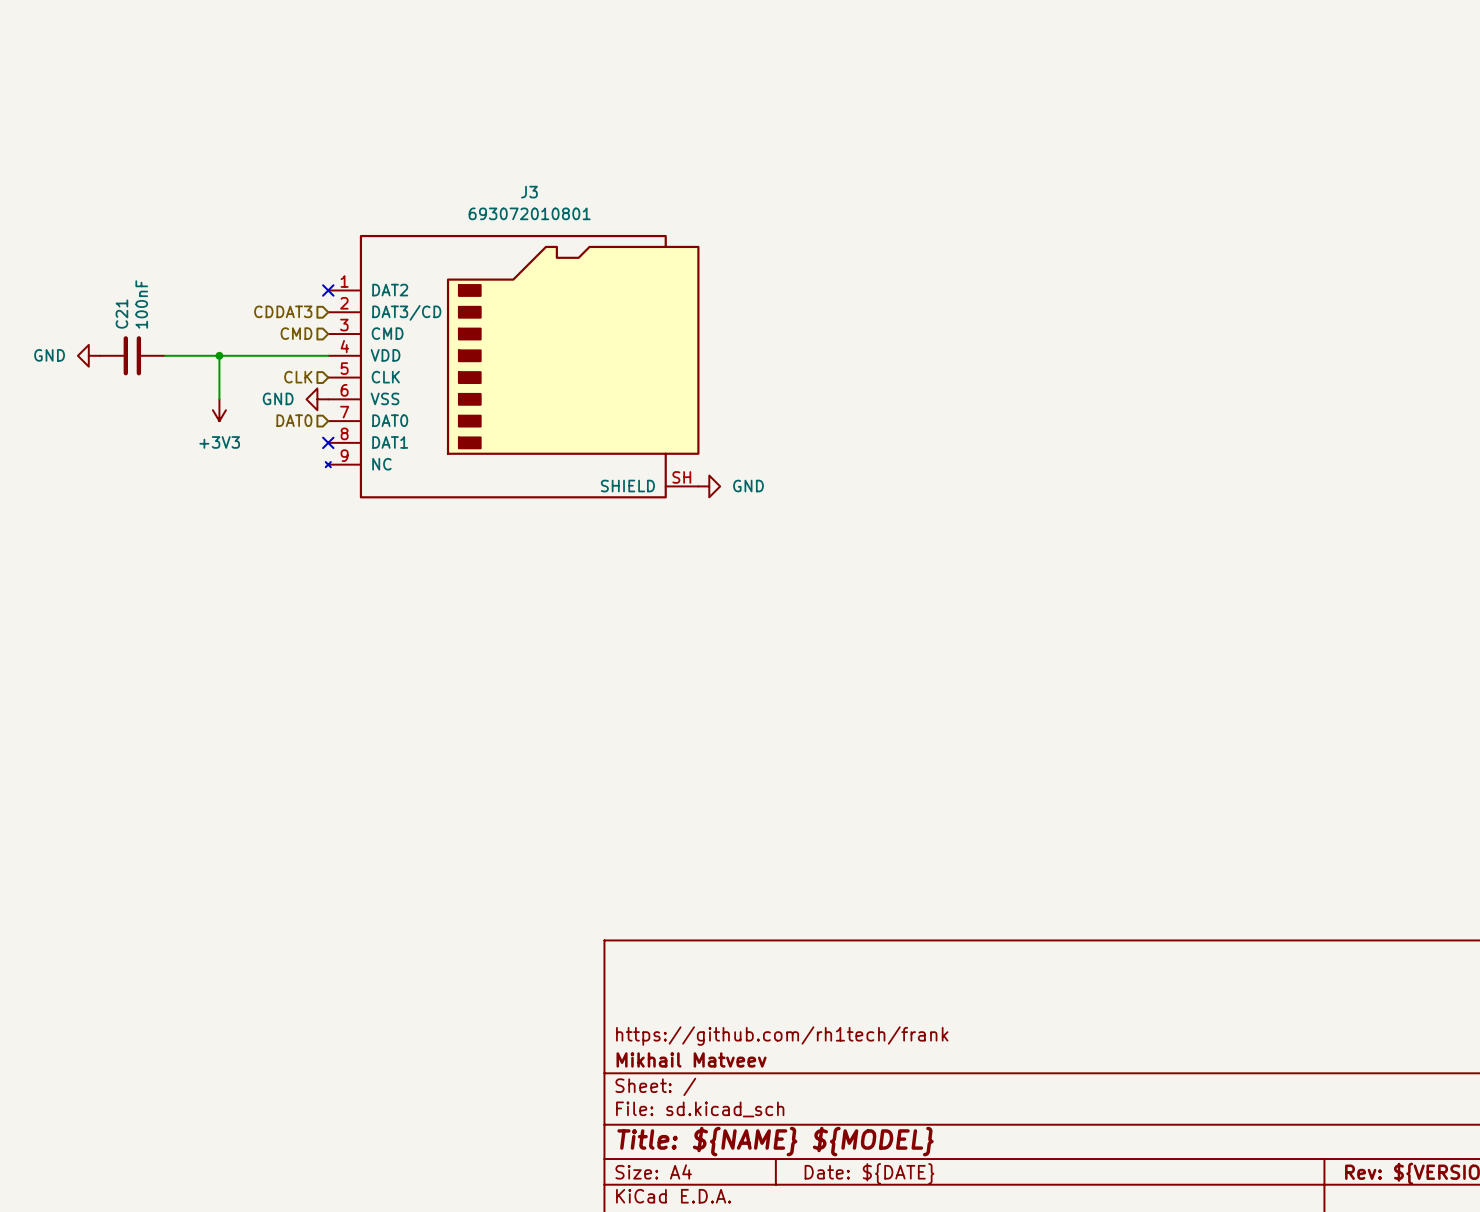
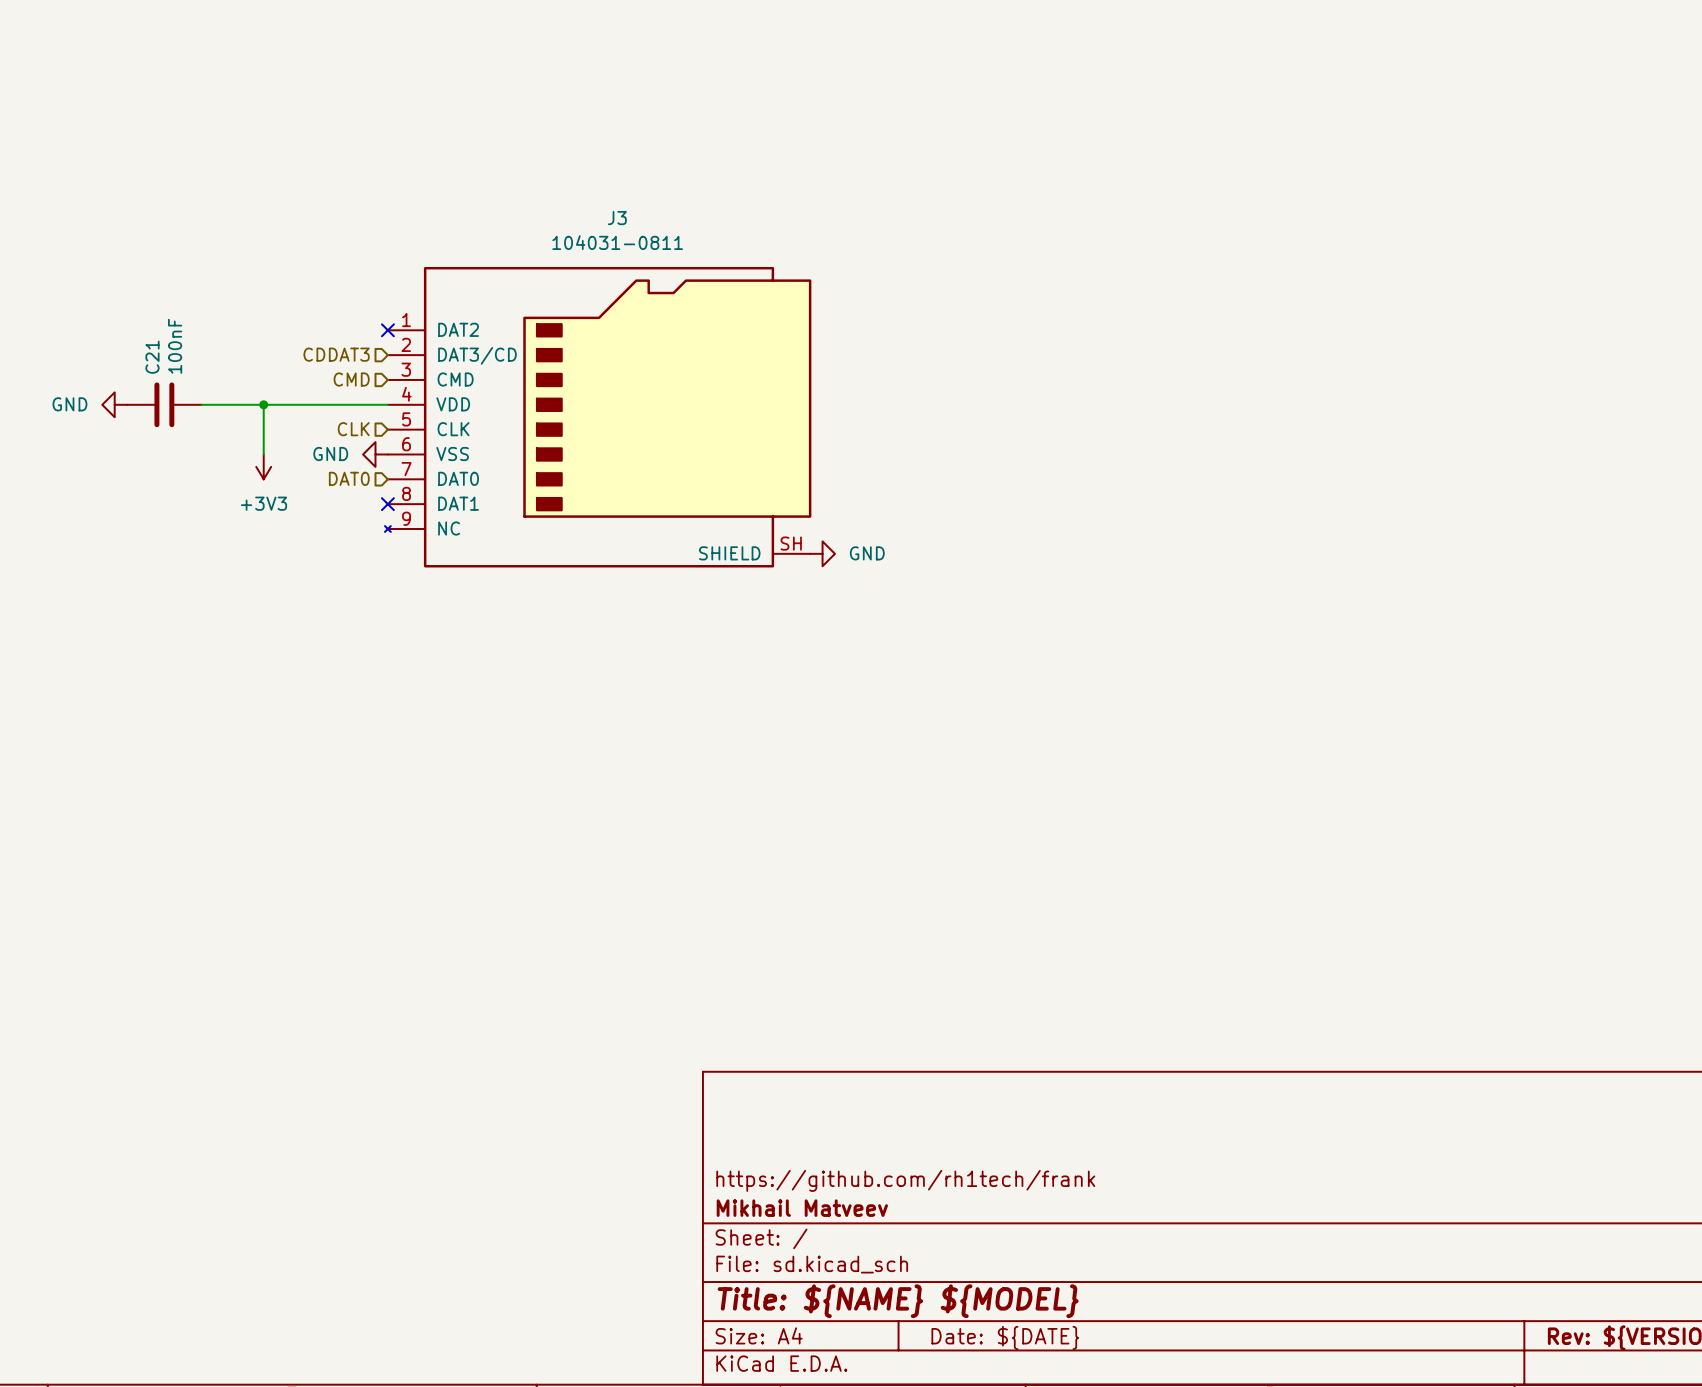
J3 value: 693072010801 (529, 213) -> 104031-0811 (617, 242)

